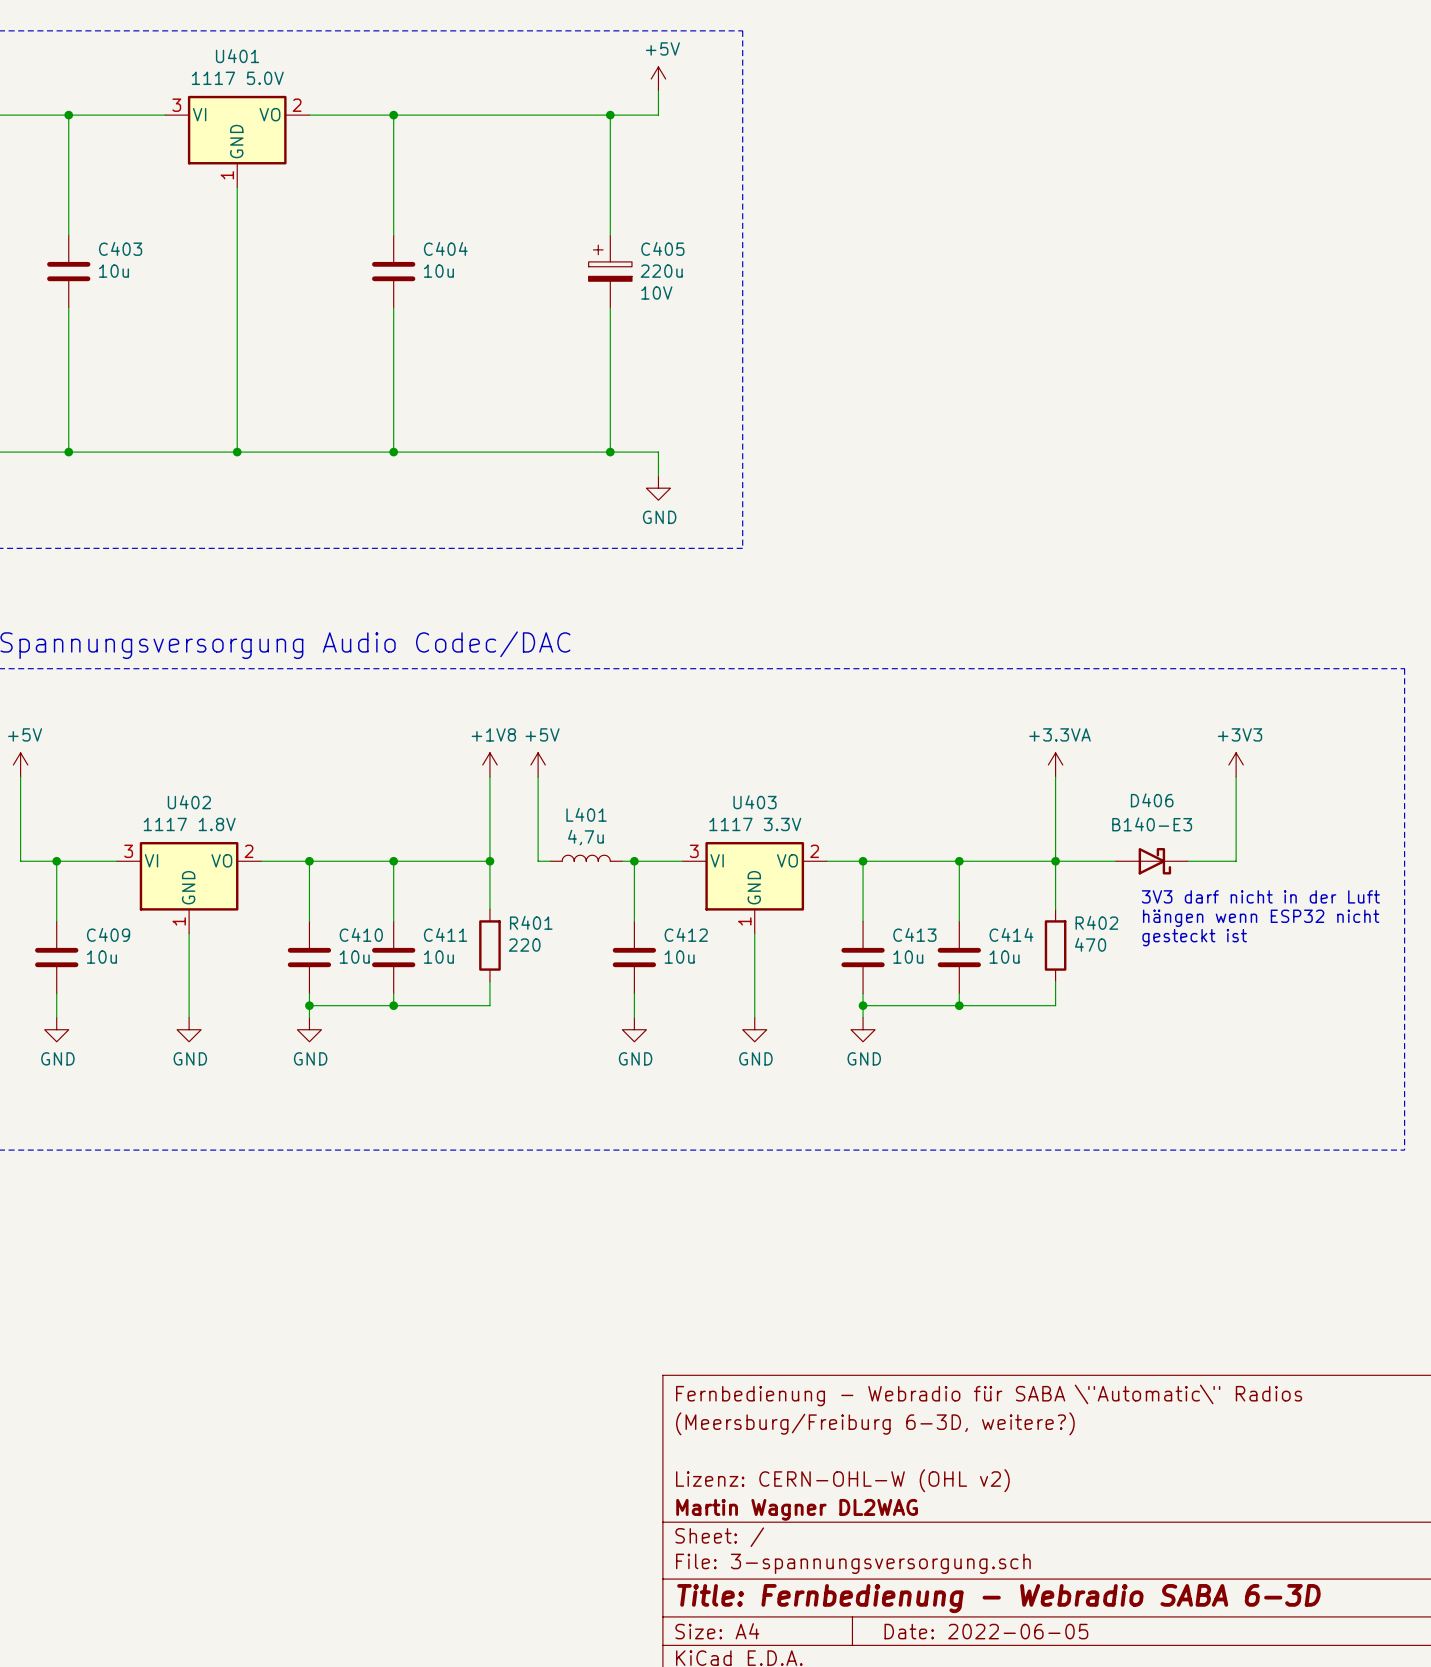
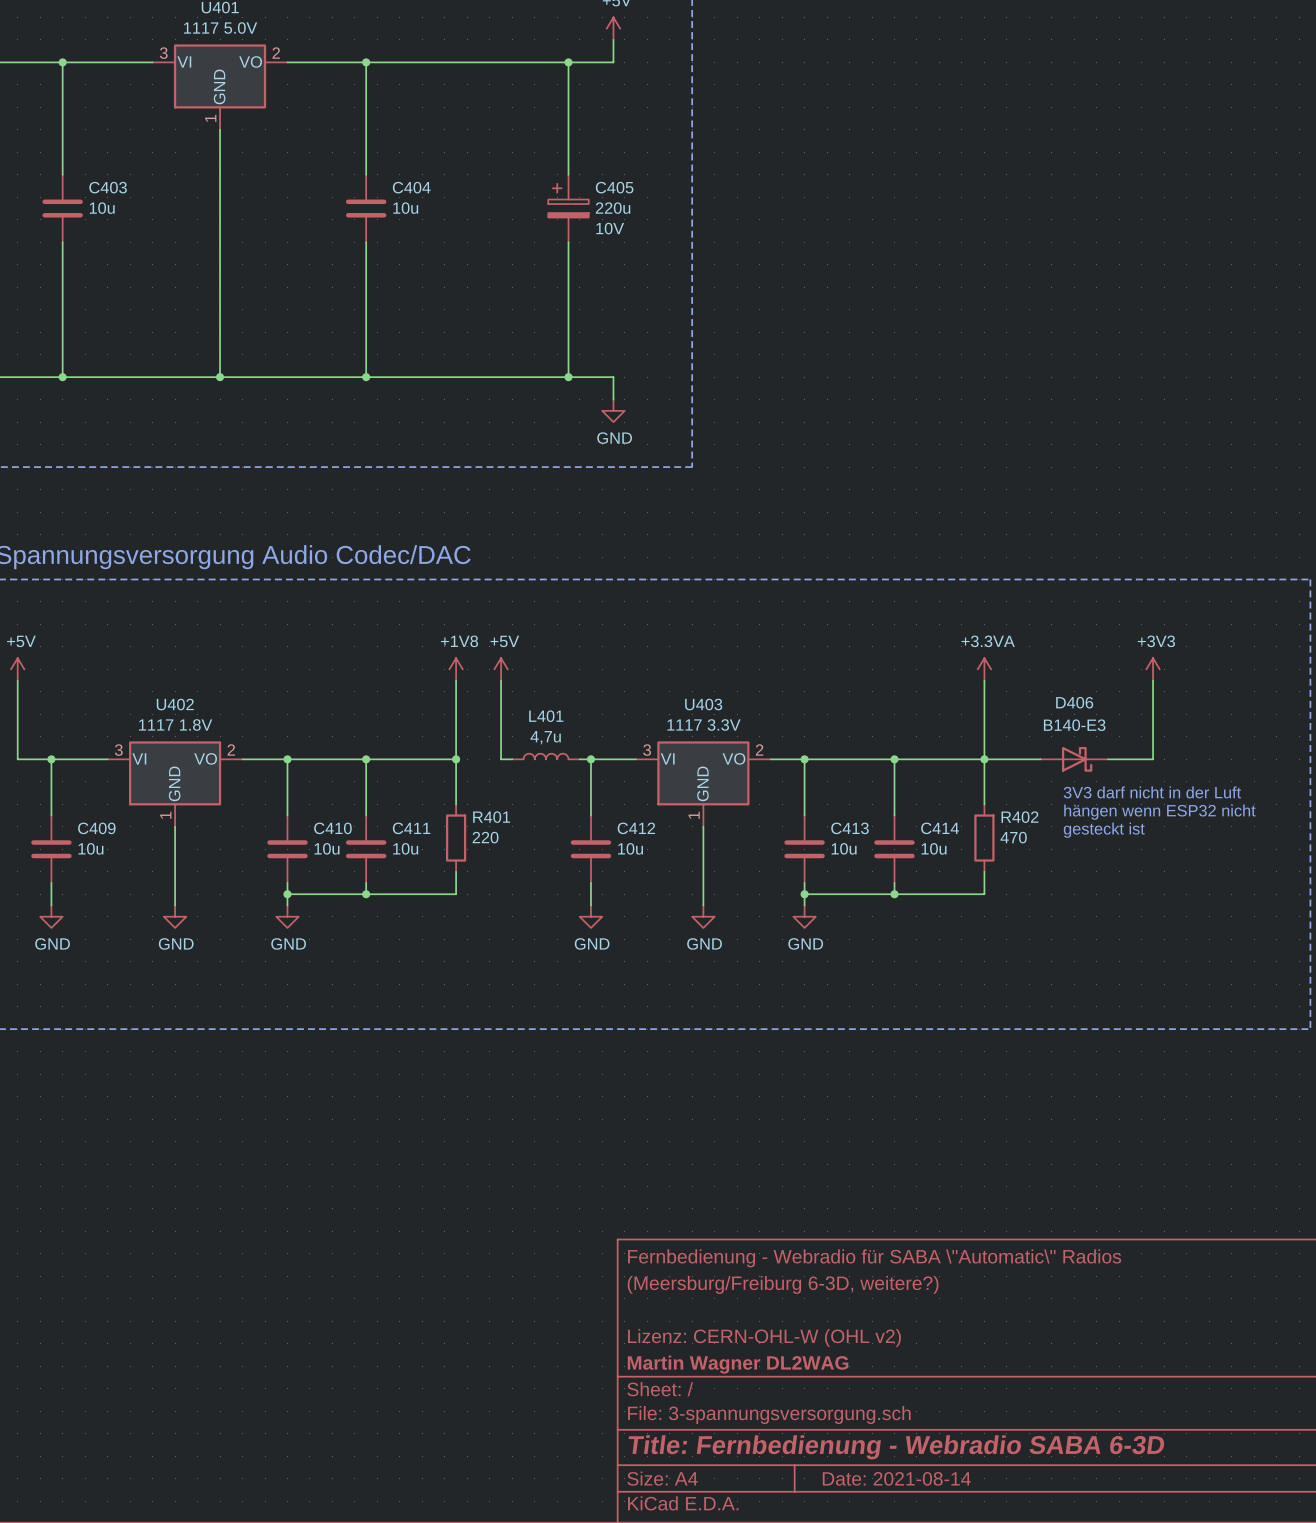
title block: Date: 2022-06-05 (986, 1631) -> Date: 2021-08-14 (896, 1478)

